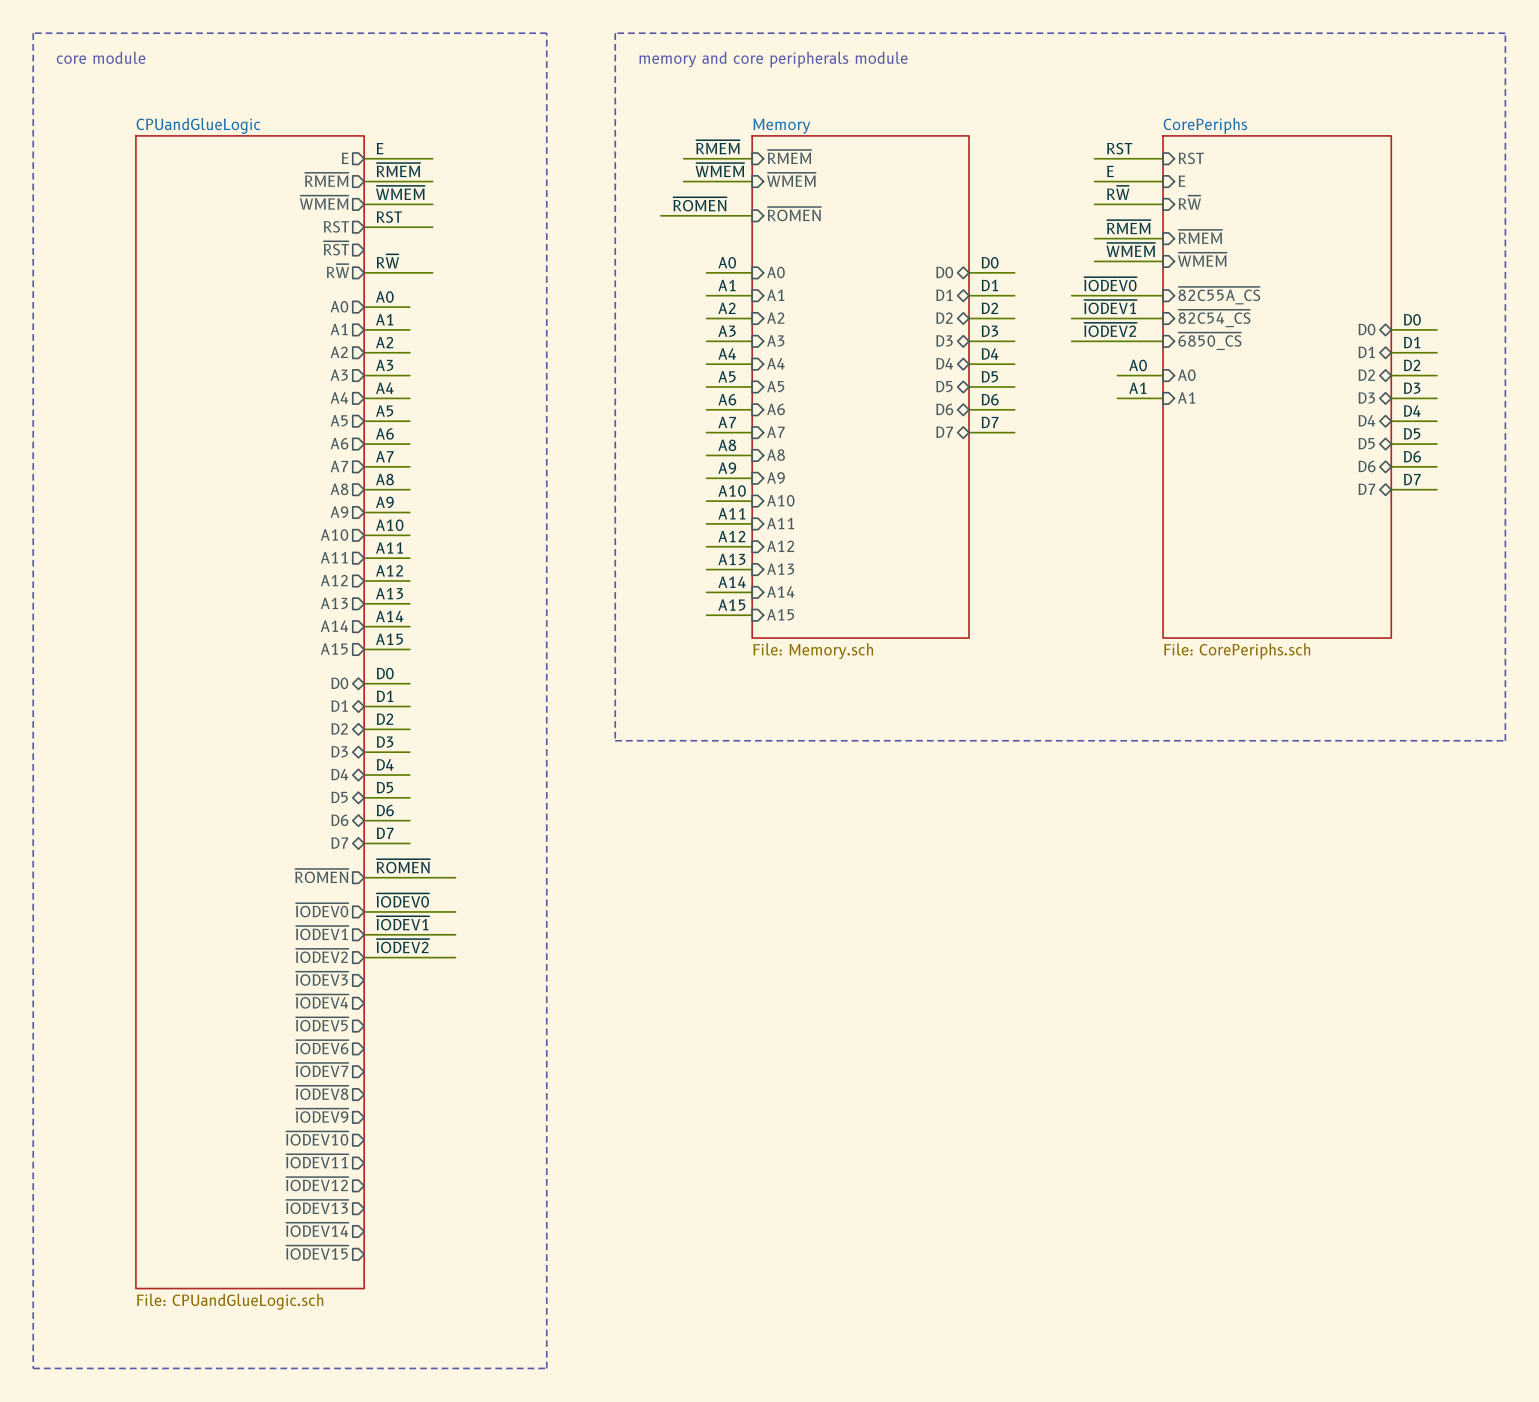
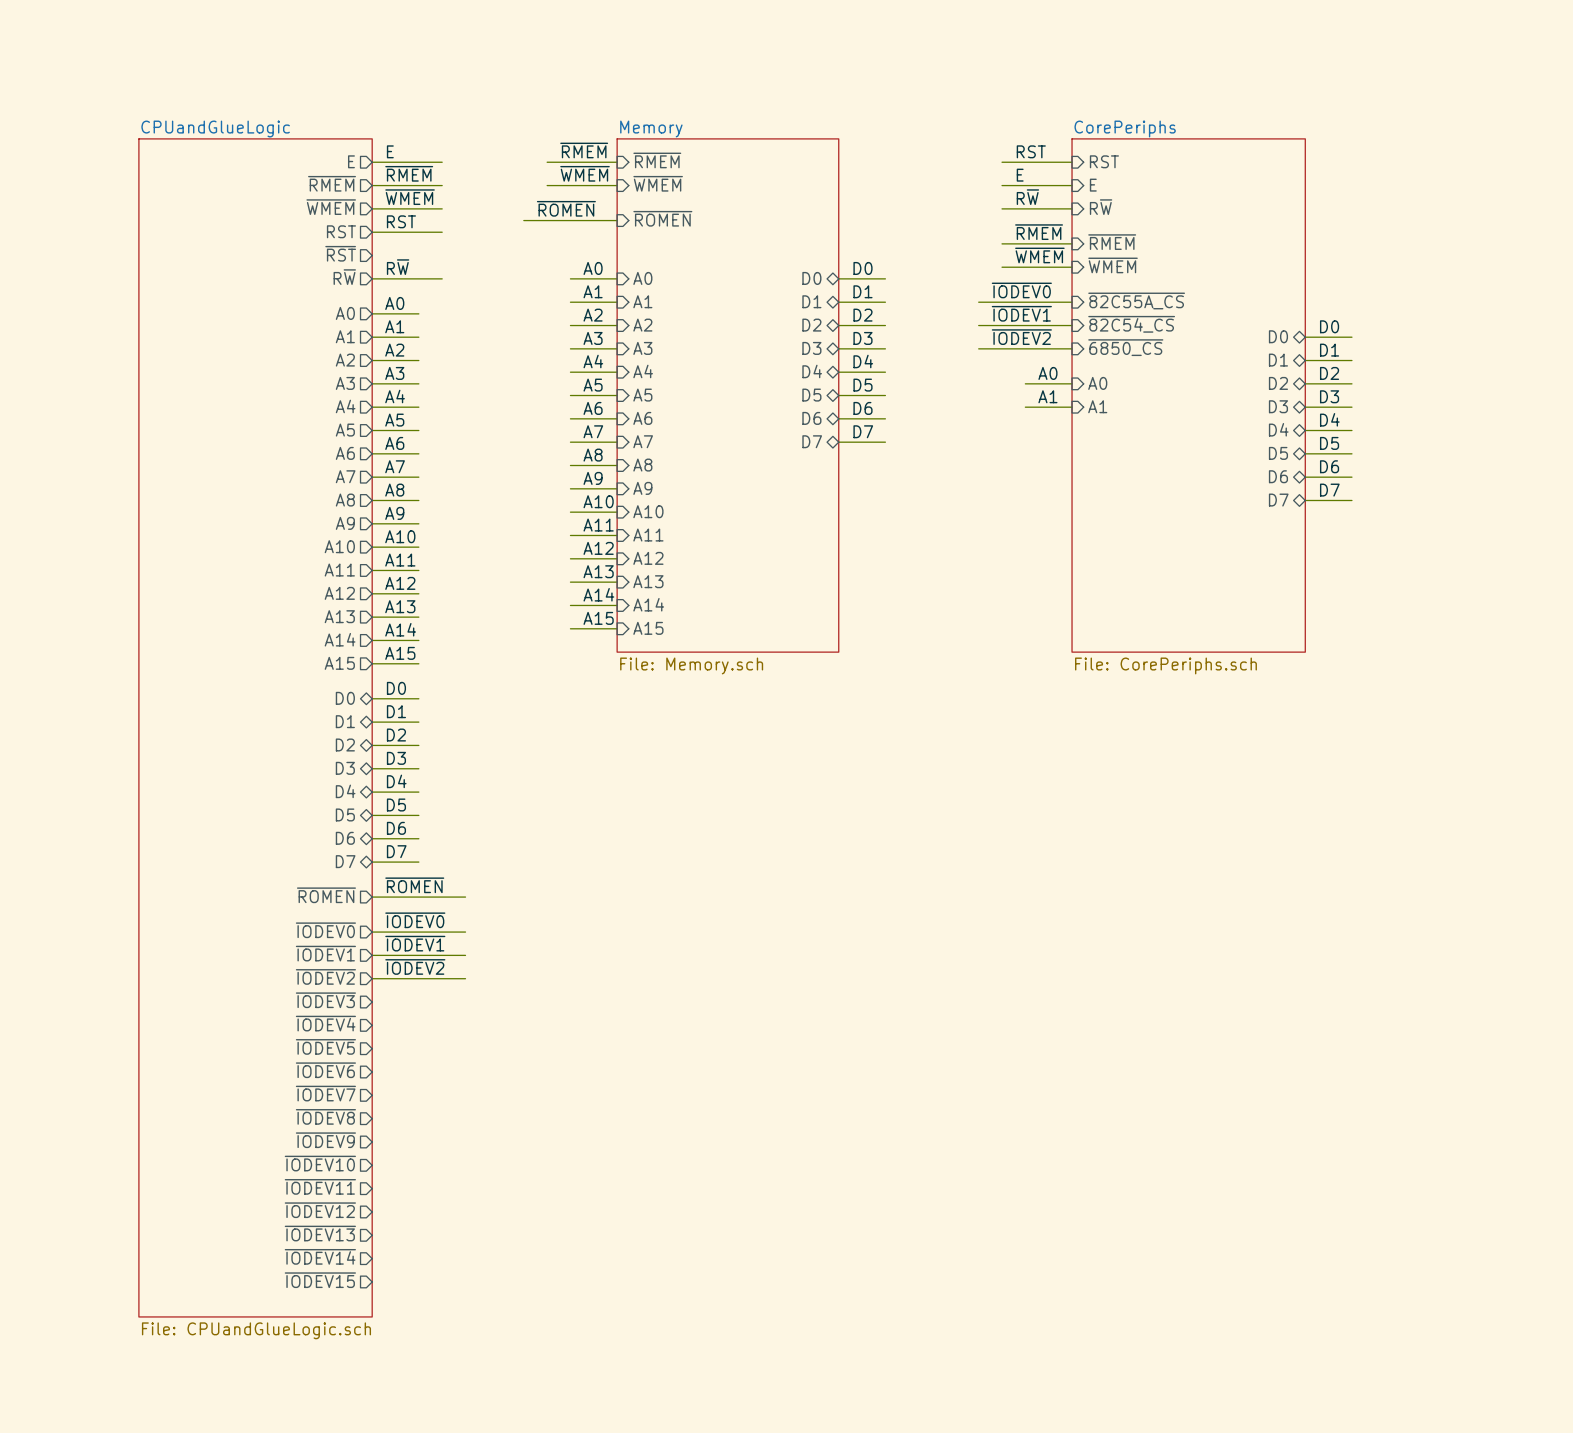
line: (33, 33) (33, 1368) (546, 1368) (546, 33) (33, 33) -> none
line: (615, 33) (1505, 33) (1505, 740) (615, 740) (615, 33) -> none
text: core module (101, 57) -> none
text: memory and core peripherals module (773, 59) -> none
label position: ~{RMEM} (718, 147) -> ~{RMEM} (584, 150)
label position: RST (1119, 148) -> RST (1031, 151)
sheet pin position: ~{RMEM} (789, 157) -> ~{RMEM} (657, 160)
wire: (683, 158) (752, 158) -> (547, 162) (617, 162)
wire: (1094, 158) (1163, 158) -> (1002, 162) (1072, 162)
sheet pin position: RST (1191, 158) -> RST (1104, 161)
label position: ~{WMEM} (719, 170) -> ~{WMEM} (585, 173)
label position: E (1110, 171) -> E (1020, 175)
sheet pin position: ~{WMEM} (791, 179) -> ~{WMEM} (658, 183)
wire: (683, 181) (752, 181) -> (547, 185) (617, 185)
wire: (1094, 181) (1163, 181) -> (1002, 185) (1072, 185)
sheet pin position: E (1182, 181) -> E (1093, 185)
label position: R~{W} (1118, 192) -> R~{W} (1027, 197)
sheet pin position: R~{W} (1189, 202) -> R~{W} (1101, 207)
label position: ~{ROMEN} (700, 204) -> ~{ROMEN} (566, 208)
wire: (1094, 204) (1163, 204) -> (1002, 208) (1072, 208)
sheet pin position: ~{ROMEN} (794, 214) -> ~{ROMEN} (662, 218)
wire: (660, 215) (752, 215) -> (523, 220) (617, 220)
label position: ~{RMEM} (1128, 227) -> ~{RMEM} (1039, 232)
sheet pin position: ~{RMEM} (1200, 236) -> ~{RMEM} (1112, 242)
wire: (1094, 238) (1163, 238) -> (1002, 243) (1072, 243)
label position: ~{WMEM} (1130, 249) -> ~{WMEM} (1039, 255)
sheet pin position: ~{WMEM} (1202, 259) -> ~{WMEM} (1113, 265)
wire: (1094, 261) (1163, 261) -> (1002, 267) (1072, 267)
label position: A0 (727, 262) -> A0 (593, 268)
label position: D0 (990, 262) -> D0 (862, 268)
wire: (706, 272) (752, 272) -> (570, 278) (617, 278)
sheet pin position: A0 (775, 272) -> A0 (642, 278)
sheet pin position: D0 (944, 272) -> D0 (811, 278)
wire: (969, 272) (1014, 272) -> (838, 278) (885, 278)
label position: ~{IODEV0} (1110, 284) -> ~{IODEV0} (1021, 290)
label position: A1 (727, 285) -> A1 (593, 291)
label position: D1 (989, 285) -> D1 (862, 291)
wire: (706, 295) (752, 295) -> (570, 302) (617, 302)
sheet pin position: A1 (775, 295) -> A1 (642, 301)
wire: none -> (838, 302) (885, 302)
sheet pin position: D1 (944, 295) -> D1 (811, 301)
wire: none -> (978, 302) (990, 302)
wire: none -> (1037, 302) (1072, 302)
wire: (1071, 295) (1163, 295) -> none
sheet pin position: ~{82C55A_CS} (1219, 295) -> ~{82C55A_CS} (1136, 300)
label position: ~{IODEV1} (1110, 307) -> ~{IODEV1} (1021, 313)
label position: A2 (727, 308) -> A2 (593, 315)
label position: D2 (989, 308) -> D2 (862, 315)
wire: (706, 318) (752, 318) -> (570, 325) (617, 325)
sheet pin position: A2 (775, 318) -> A2 (642, 325)
wire: none -> (838, 325) (885, 325)
sheet pin position: D2 (944, 318) -> D2 (811, 325)
wire: none -> (978, 325) (990, 325)
wire: none -> (1037, 325) (1072, 325)
wire: (1071, 318) (1163, 318) -> none
sheet pin position: ~{82C54_CS} (1214, 318) -> ~{82C54_CS} (1131, 324)
label position: D0 (1412, 319) -> D0 (1329, 326)
label position: ~{IODEV2} (1110, 329) -> ~{IODEV2} (1021, 337)
sheet pin position: D0 (1366, 329) -> D0 (1278, 336)
wire: (1391, 329) (1436, 329) -> (1305, 337) (1351, 337)
label position: A3 (727, 331) -> A3 (593, 338)
label position: D3 (989, 331) -> D3 (862, 338)
sheet pin position: A3 (775, 340) -> A3 (642, 348)
sheet pin position: D3 (944, 340) -> D3 (811, 348)
wire: (706, 341) (752, 341) -> (570, 348) (617, 348)
wire: none -> (838, 348) (885, 348)
wire: none -> (978, 348) (990, 348)
wire: none -> (1037, 348) (1072, 348)
wire: (1071, 341) (1163, 341) -> none
sheet pin position: ~{6850_CS} (1209, 341) -> ~{6850_CS} (1125, 347)
label position: D1 (1412, 342) -> D1 (1329, 350)
sheet pin position: D1 (1366, 352) -> D1 (1278, 360)
wire: (1391, 352) (1436, 352) -> (1305, 360) (1351, 360)
label position: A4 (727, 353) -> A4 (593, 361)
label position: D4 (990, 353) -> D4 (863, 361)
sheet pin position: A4 (775, 363) -> A4 (643, 371)
sheet pin position: D4 (944, 363) -> D4 (812, 371)
wire: (706, 364) (752, 364) -> (570, 372) (617, 372)
wire: (969, 364) (1014, 364) -> (838, 372) (885, 372)
label position: A0 (1138, 365) -> A0 (1047, 373)
label position: D2 (1412, 365) -> D2 (1329, 373)
wire: (1117, 375) (1163, 375) -> (1025, 383) (1072, 383)
sheet pin position: A0 (1186, 375) -> A0 (1097, 383)
sheet pin position: D2 (1366, 375) -> D2 (1278, 383)
wire: (1391, 375) (1436, 375) -> (1305, 383) (1351, 383)
label position: A5 (726, 376) -> A5 (593, 385)
label position: D5 (989, 376) -> D5 (862, 385)
wire: (706, 386) (752, 386) -> (570, 395) (617, 395)
sheet pin position: A5 (775, 386) -> A5 (642, 395)
sheet Memory position: (860, 386) -> (727, 395)
sheet pin position: D5 (944, 386) -> D5 (811, 395)
wire: (969, 386) (1014, 386) -> (838, 395) (885, 395)
sheet CorePeriphs position: (1277, 386) -> (1188, 395)
label position: A1 (1137, 388) -> A1 (1047, 396)
label position: D3 (1412, 388) -> D3 (1329, 396)
sheet pin position: A1 (1186, 397) -> A1 (1097, 406)
wire: (1117, 398) (1163, 398) -> (1025, 407) (1072, 407)
sheet pin position: D3 (1366, 398) -> D3 (1278, 406)
wire: (1391, 398) (1436, 398) -> (1305, 407) (1351, 407)
label position: A6 (727, 399) -> A6 (593, 408)
label position: D6 (990, 399) -> D6 (862, 408)
wire: (706, 409) (752, 409) -> (570, 418) (617, 418)
sheet pin position: A6 (776, 409) -> A6 (642, 418)
sheet pin position: D6 (944, 409) -> D6 (811, 418)
wire: (969, 409) (1014, 409) -> (838, 418) (885, 418)
label position: D4 (1412, 411) -> D4 (1329, 419)
sheet pin position: D4 (1366, 420) -> D4 (1278, 429)
wire: (1391, 421) (1436, 421) -> (1305, 430) (1351, 430)
label position: A7 (727, 422) -> A7 (593, 431)
label position: D7 (990, 422) -> D7 (863, 431)
wire: (706, 432) (752, 432) -> (570, 442) (617, 442)
sheet pin position: A7 (775, 432) -> A7 (643, 441)
sheet pin position: D7 (944, 432) -> D7 (812, 441)
wire: (969, 432) (1014, 432) -> (838, 442) (885, 442)
label position: D5 (1412, 433) -> D5 (1329, 443)
sheet pin position: D5 (1366, 443) -> D5 (1278, 453)
wire: (1391, 444) (1436, 444) -> (1305, 453) (1351, 453)
label position: A8 (727, 445) -> A8 (593, 455)
wire: (706, 455) (752, 455) -> (570, 465) (617, 465)
sheet pin position: A8 (776, 455) -> A8 (642, 465)
label position: D6 (1412, 456) -> D6 (1329, 466)
sheet pin position: D6 (1367, 466) -> D6 (1278, 476)
wire: (1391, 466) (1436, 466) -> (1305, 477) (1351, 477)
label position: A9 (727, 468) -> A9 (593, 478)
sheet pin position: A9 (776, 477) -> A9 (642, 488)
wire: (706, 478) (752, 478) -> (570, 488) (617, 488)
label position: D7 (1412, 479) -> D7 (1329, 490)
sheet pin position: D7 (1366, 489) -> D7 (1278, 500)
wire: (1391, 489) (1436, 489) -> (1305, 500) (1351, 500)
label position: A10 (732, 490) -> A10 (598, 501)
sheet pin position: A10 (780, 500) -> A10 (648, 511)
wire: (706, 501) (752, 501) -> (570, 512) (617, 512)
label position: A11 (731, 513) -> A11 (598, 525)
wire: (706, 523) (752, 523) -> (570, 535) (617, 535)
sheet pin position: A11 (780, 523) -> A11 (648, 535)
label position: A12 (731, 536) -> A12 (598, 548)
wire: (706, 546) (752, 546) -> (570, 558) (617, 558)
sheet pin position: A12 (780, 546) -> A12 (648, 558)
label position: A13 (731, 559) -> A13 (598, 571)
wire: (706, 569) (752, 569) -> (570, 582) (617, 582)
sheet pin position: A13 (780, 569) -> A13 (648, 581)
label position: A14 (732, 582) -> A14 (598, 594)
sheet pin position: A14 (780, 591) -> A14 (648, 604)
wire: (706, 592) (752, 592) -> (570, 605) (617, 605)
label position: A15 (731, 605) -> A15 (598, 618)
sheet pin position: A15 (780, 614) -> A15 (648, 628)
wire: (706, 615) (752, 615) -> (570, 628) (617, 628)

